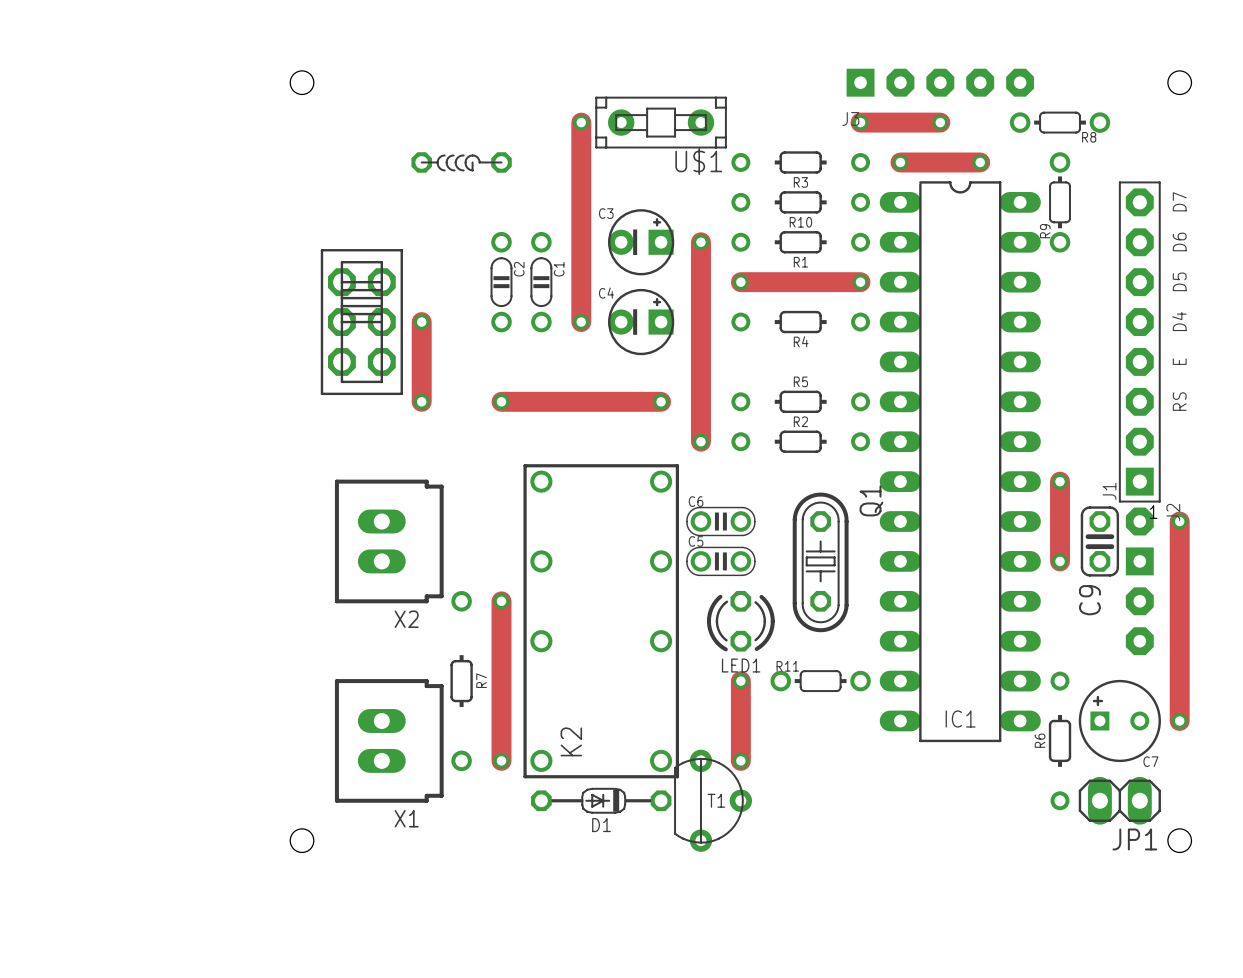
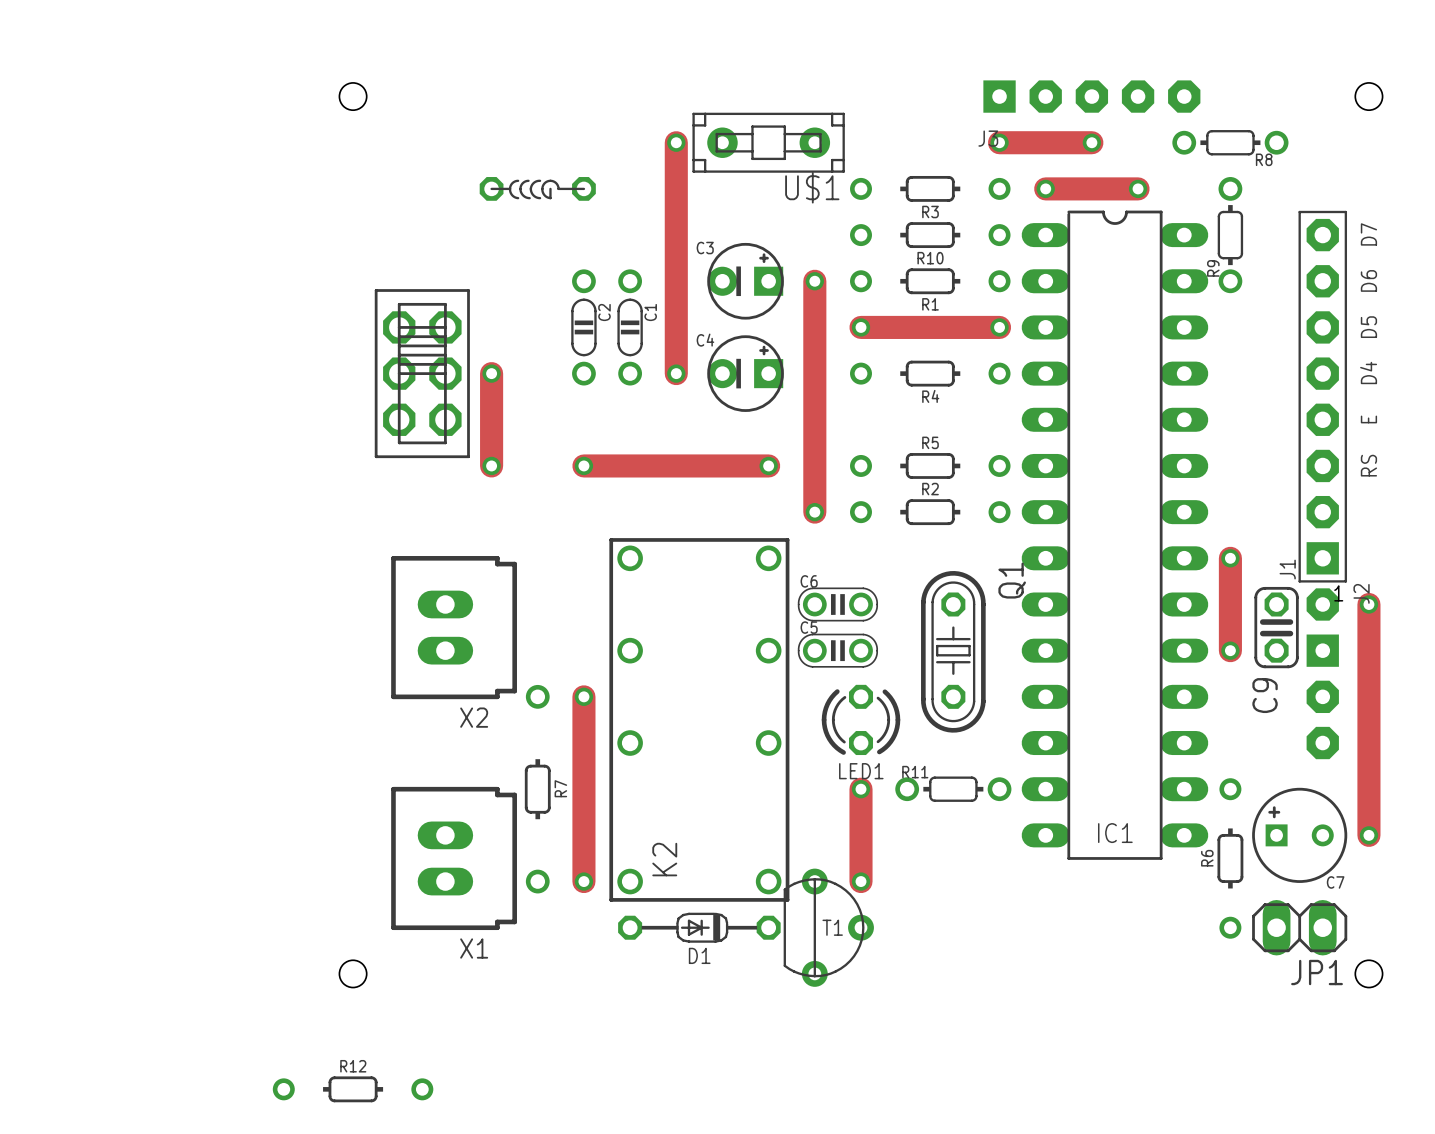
R12: none -> (353, 1089)

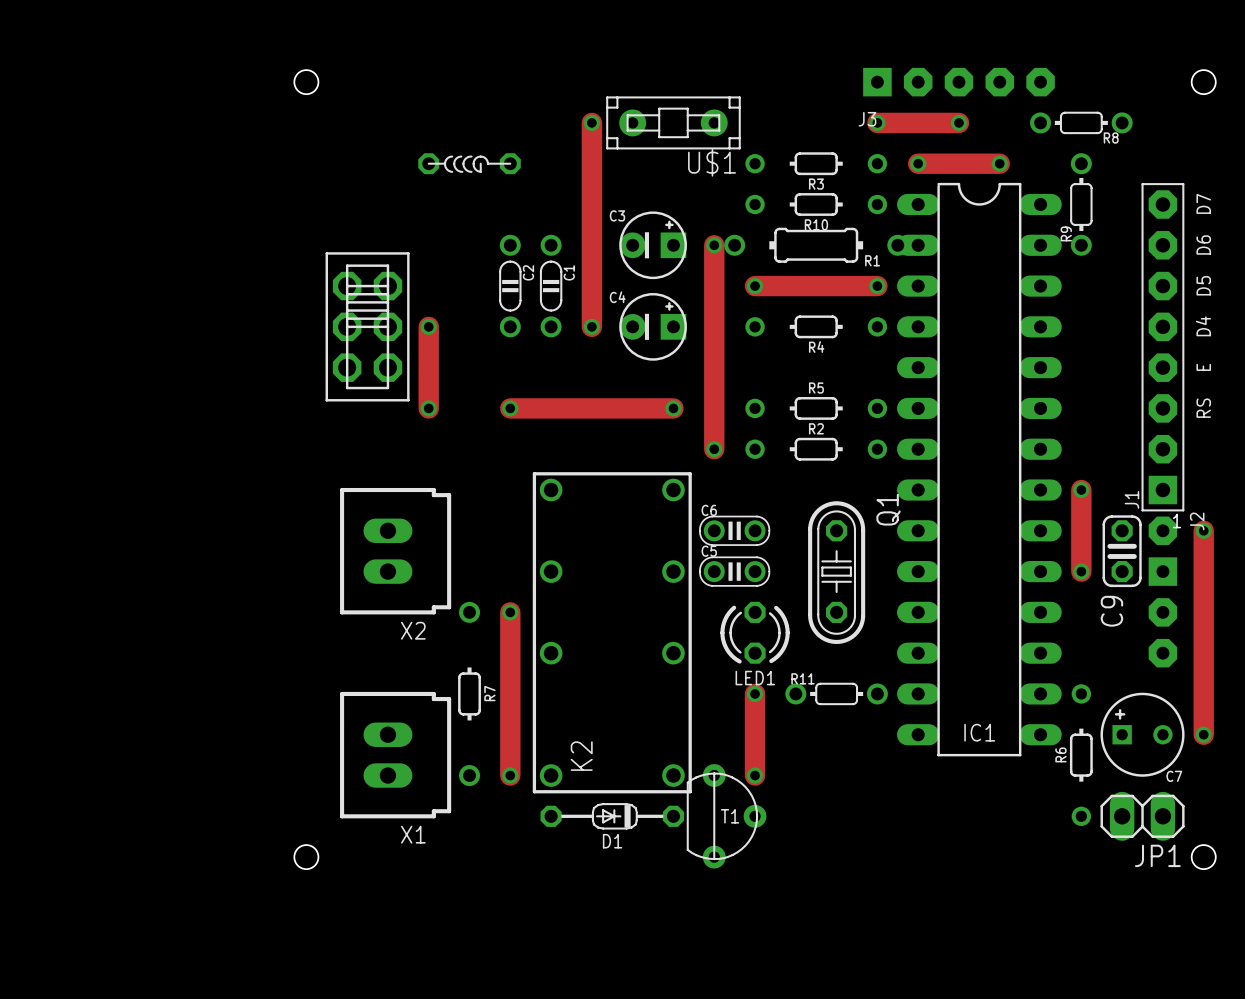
IC1 footprint: [1021, 210, 1209, 860] -> [896, 182, 1062, 757]
R1 footprint: [850, 268, 1011, 295] -> [724, 227, 909, 263]
R1 name position: R1 (930, 304) -> R1 (872, 260)
R12: (353, 1089) -> none

